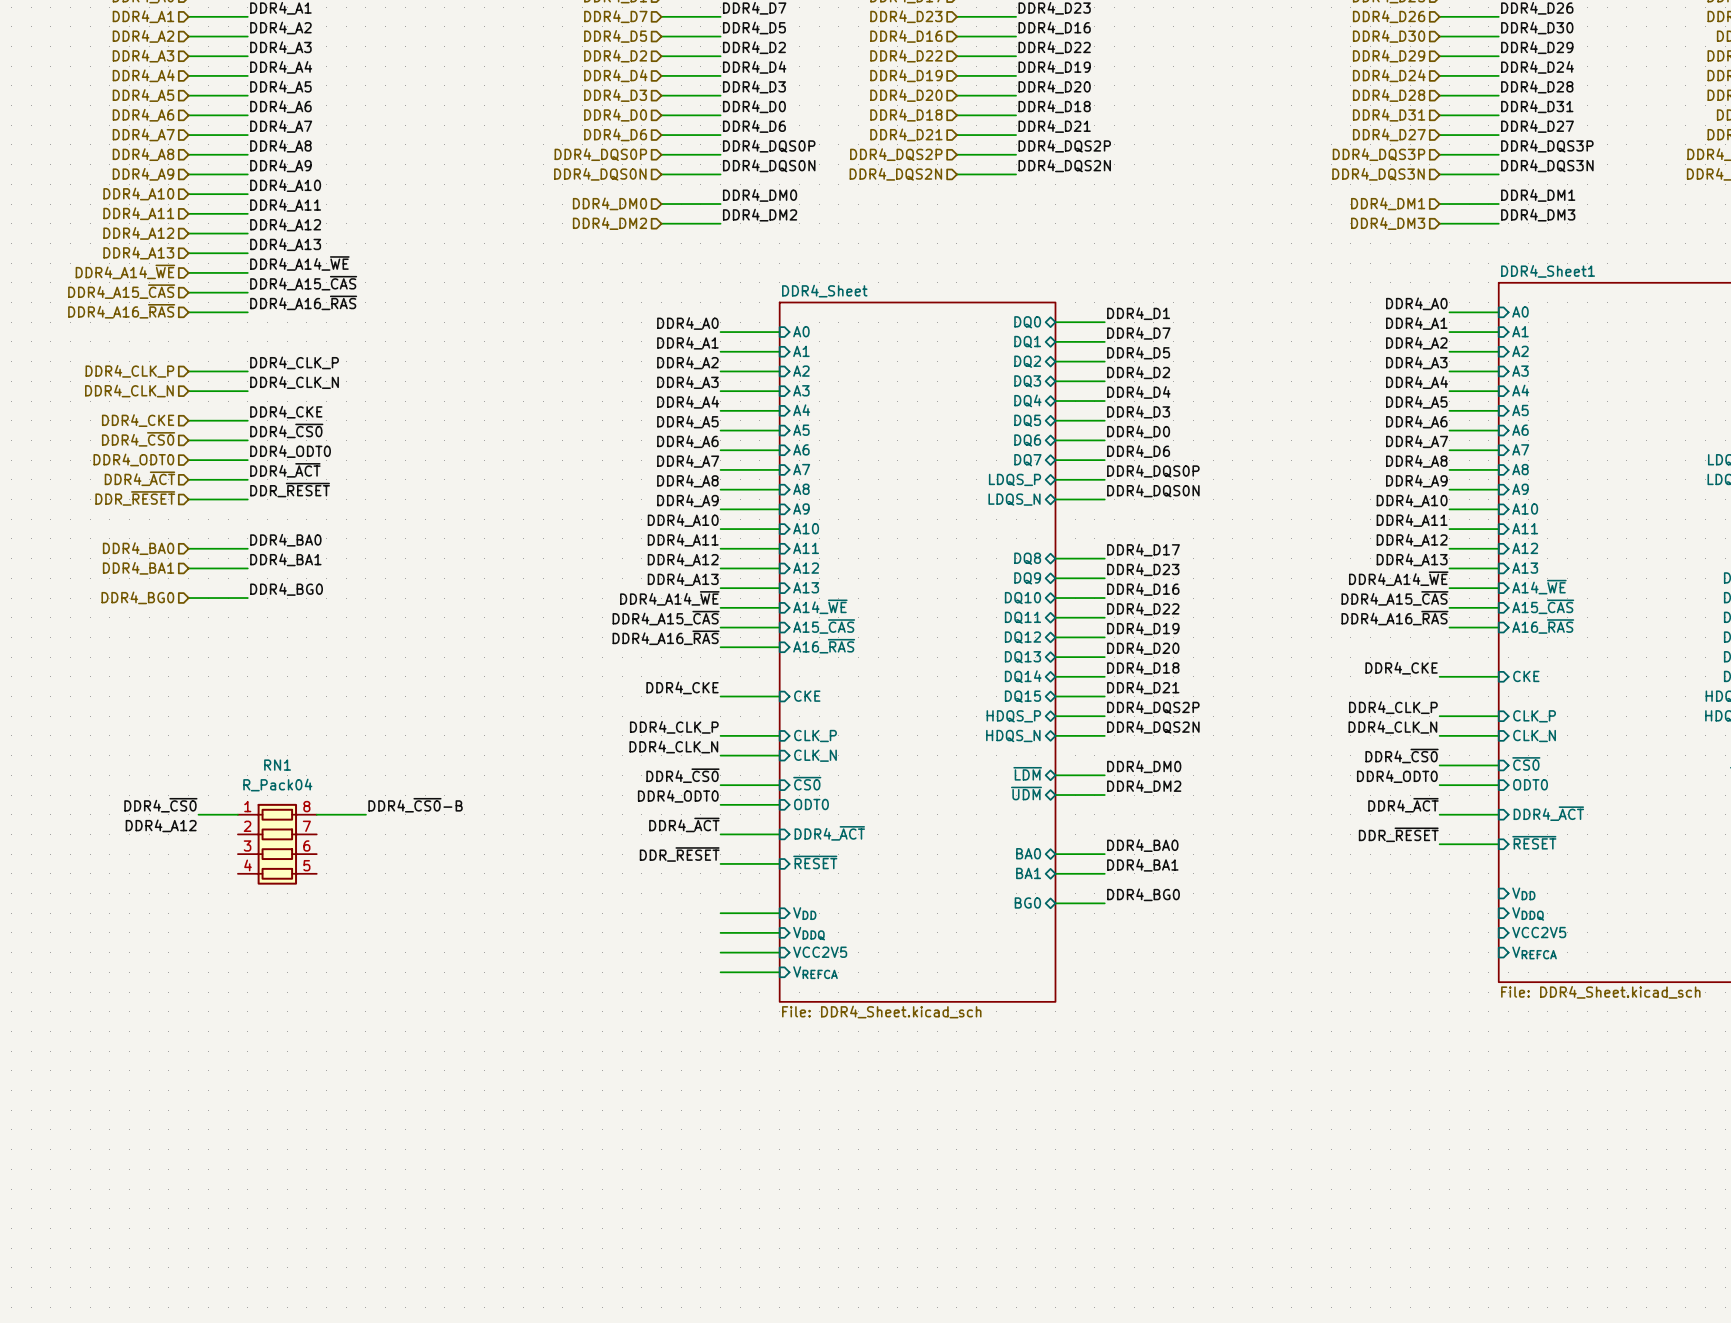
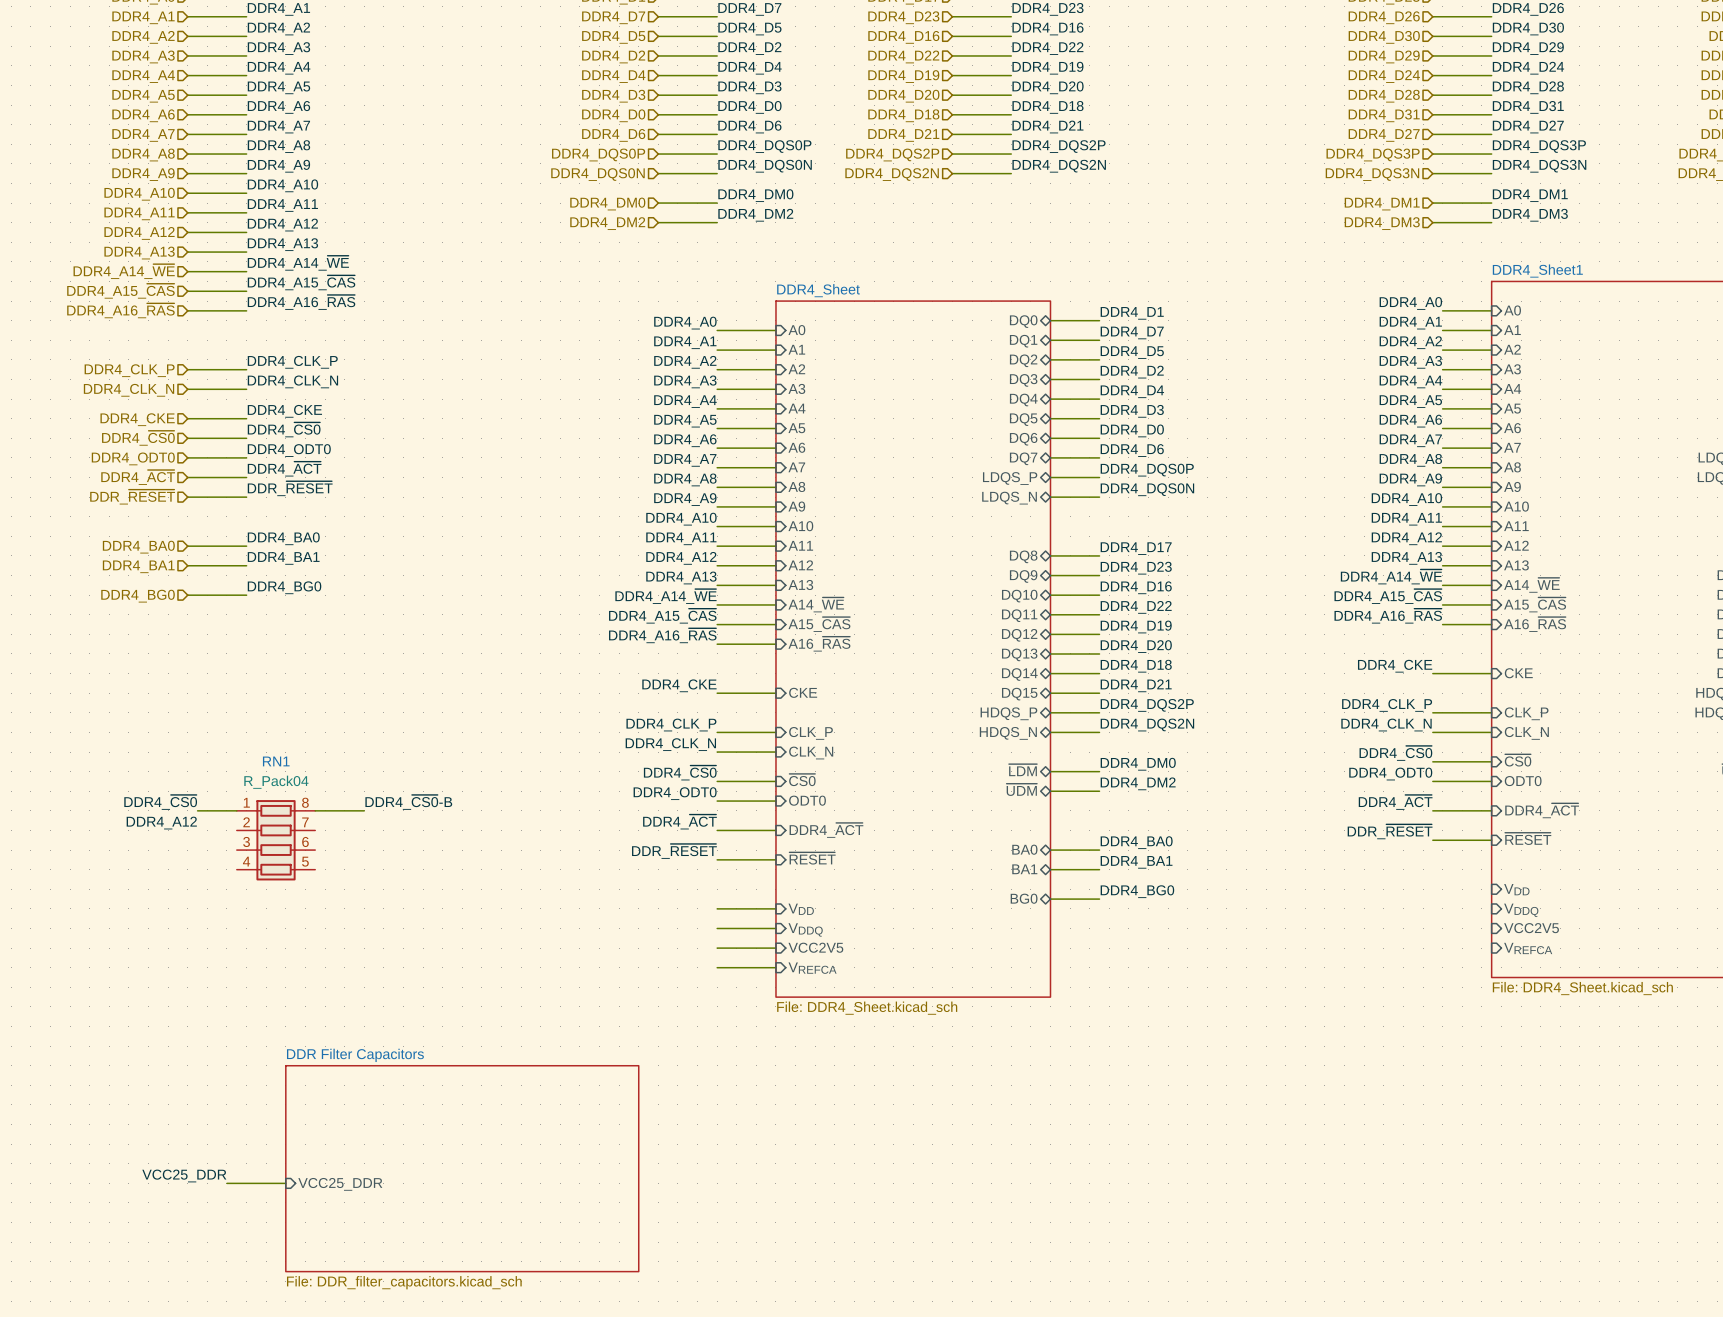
sheet DDR Filter Capacitors: none -> File: DDR_filter_capacitors.kicad_sch (462, 1168)
label: none -> VCC25_DDR (184, 1175)
wire: none -> (226, 1183) (285, 1183)
sheet pin: none -> VCC25_DDR (340, 1184)

